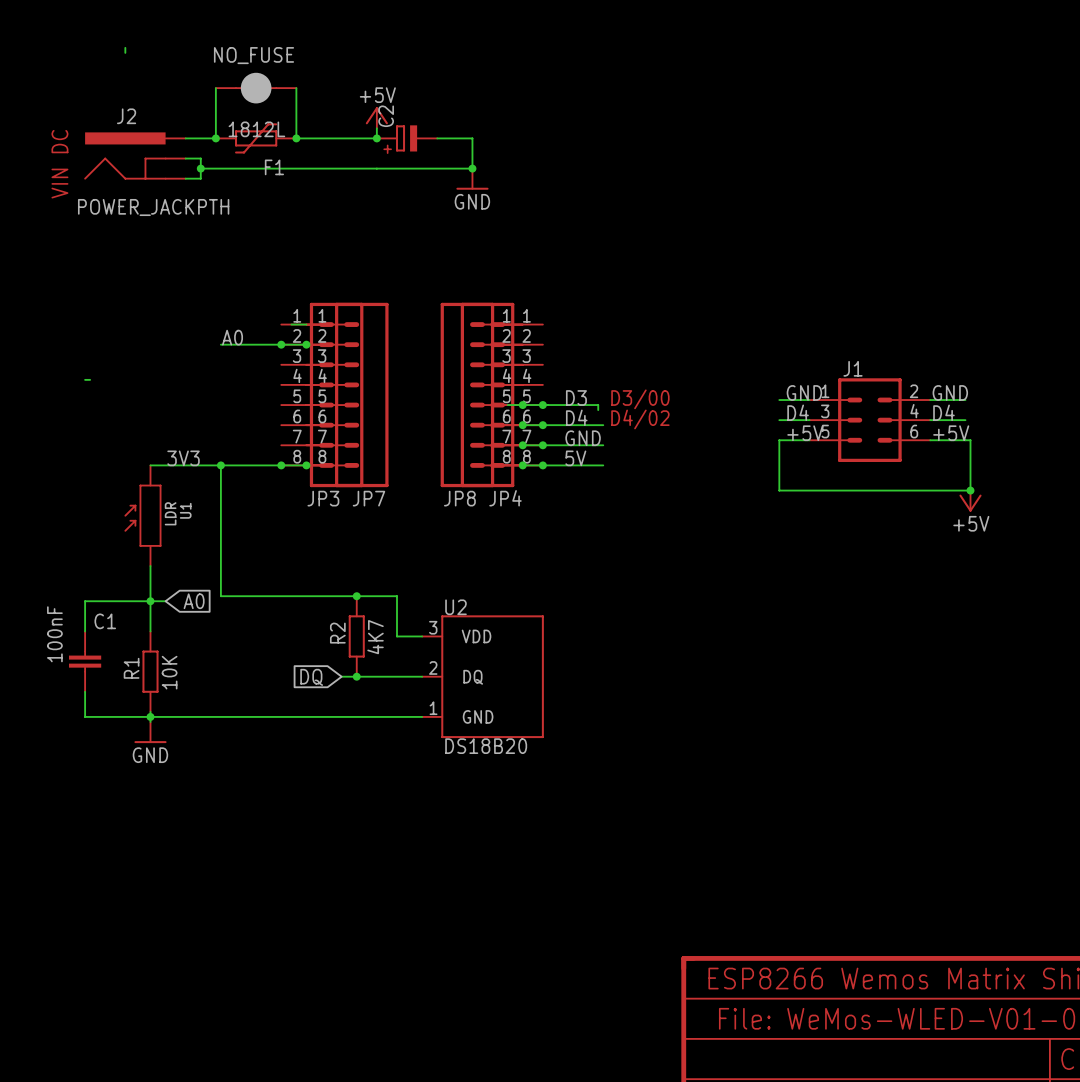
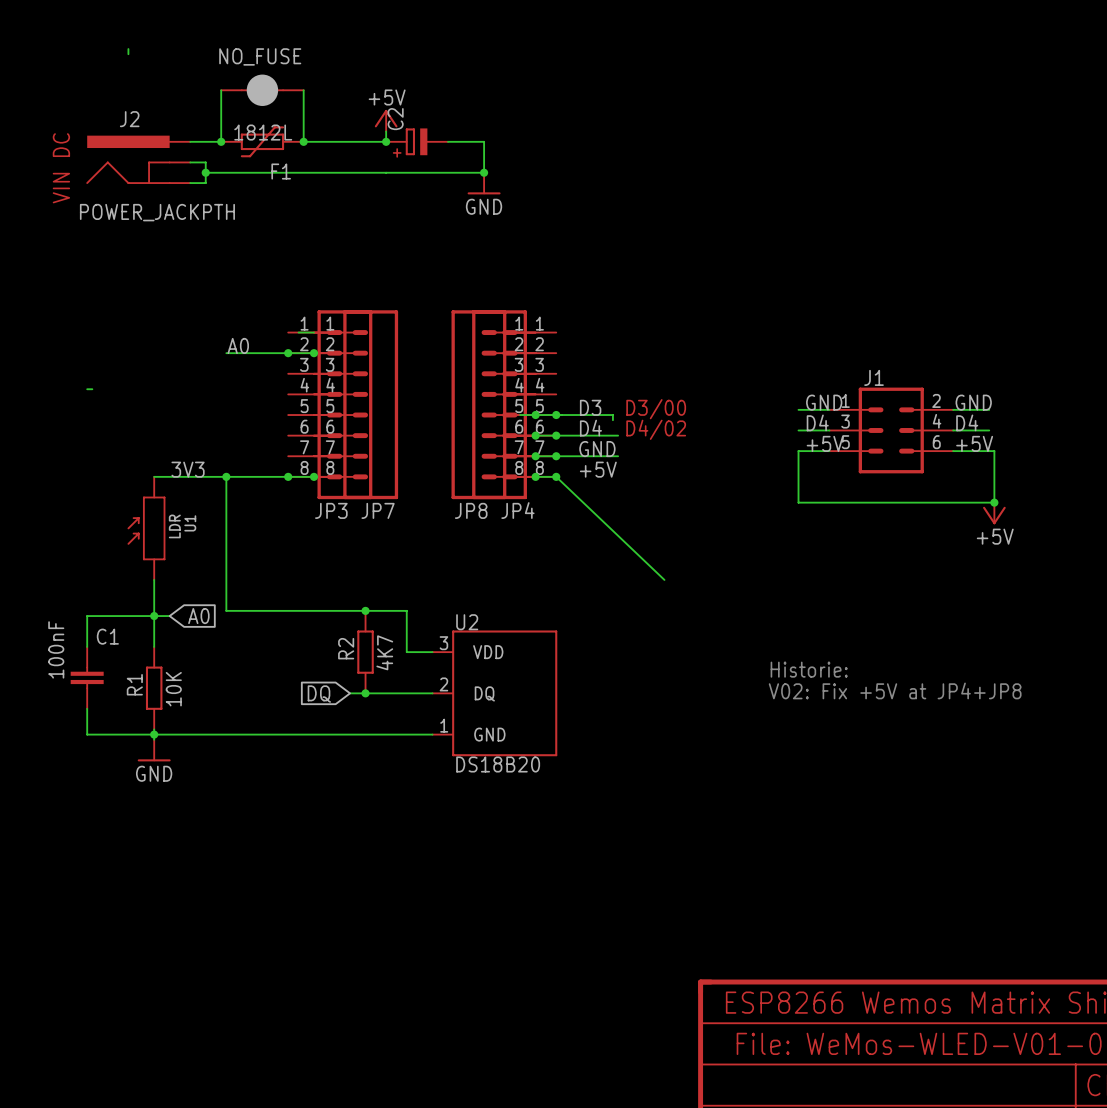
label: 5V (575, 458) -> +5V (598, 469)
wire: (542, 465) (603, 465) -> (556, 476) (664, 579)
text: none -> Historie: (809, 669)
text: none -> V02: Fix +5V at JP4+JP8 (895, 690)

